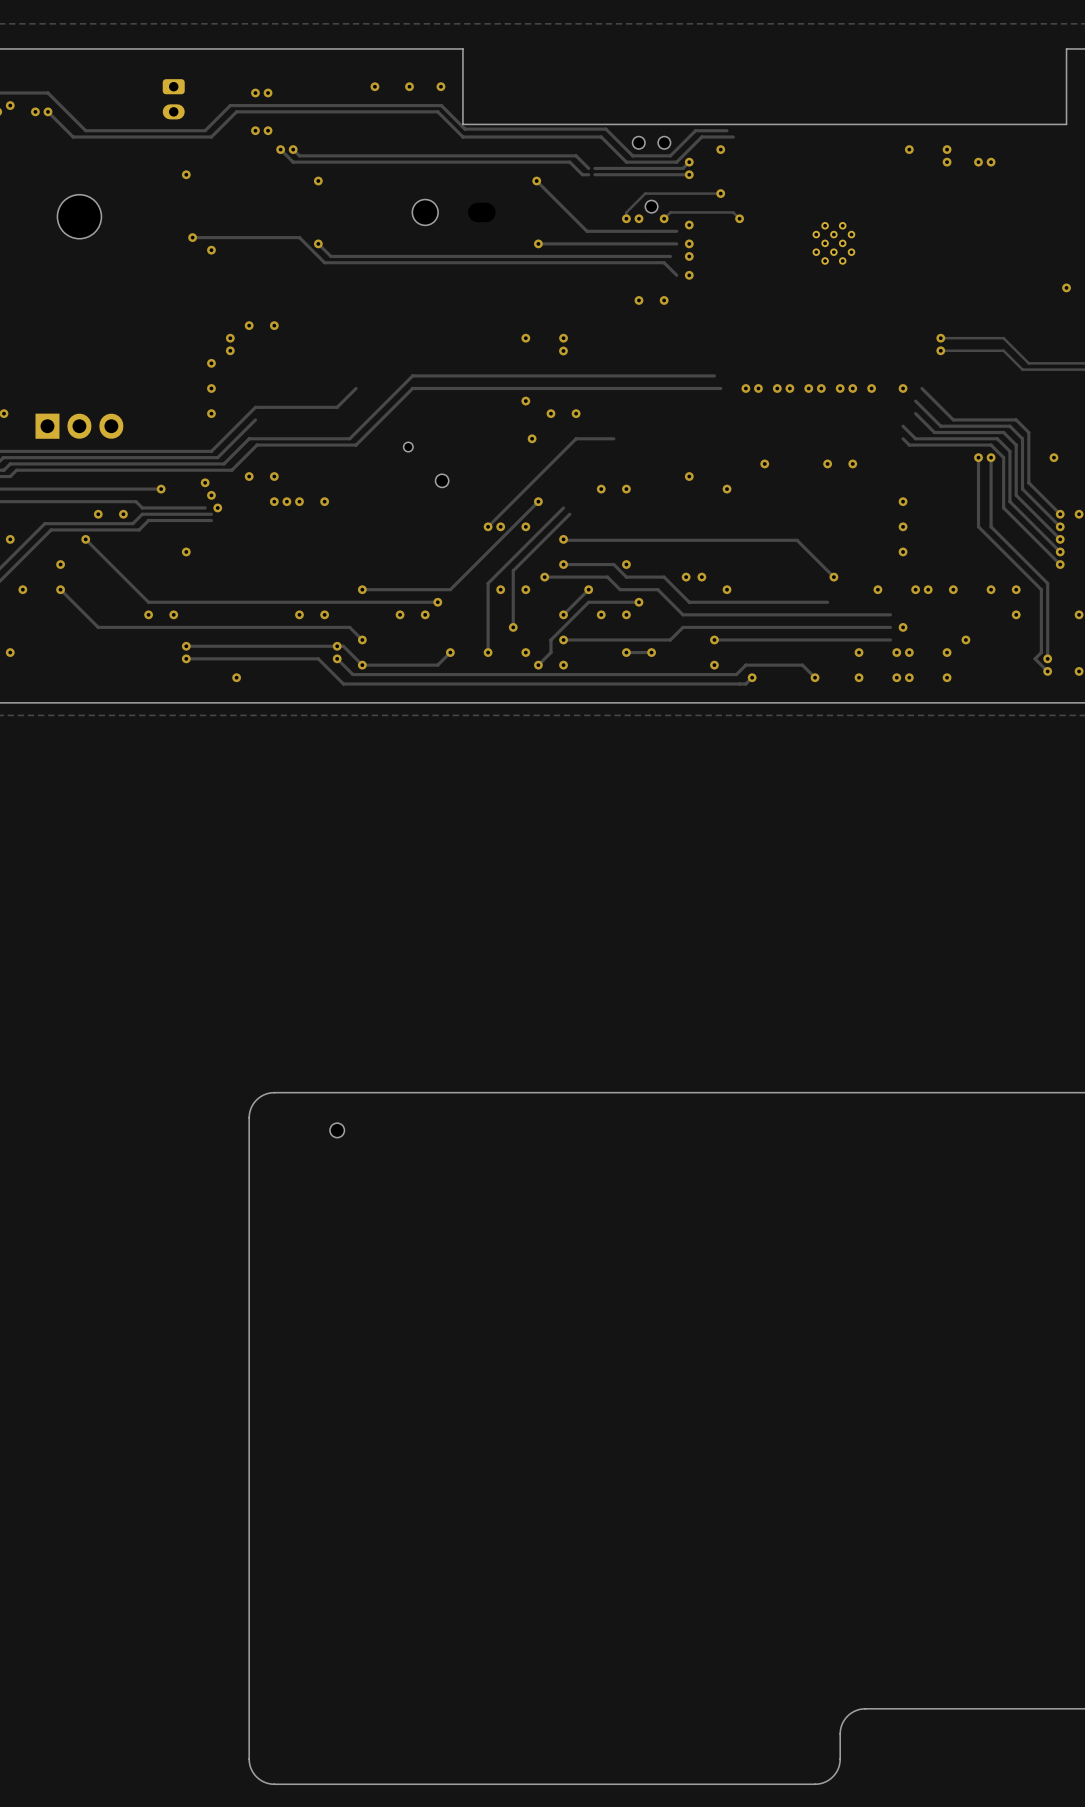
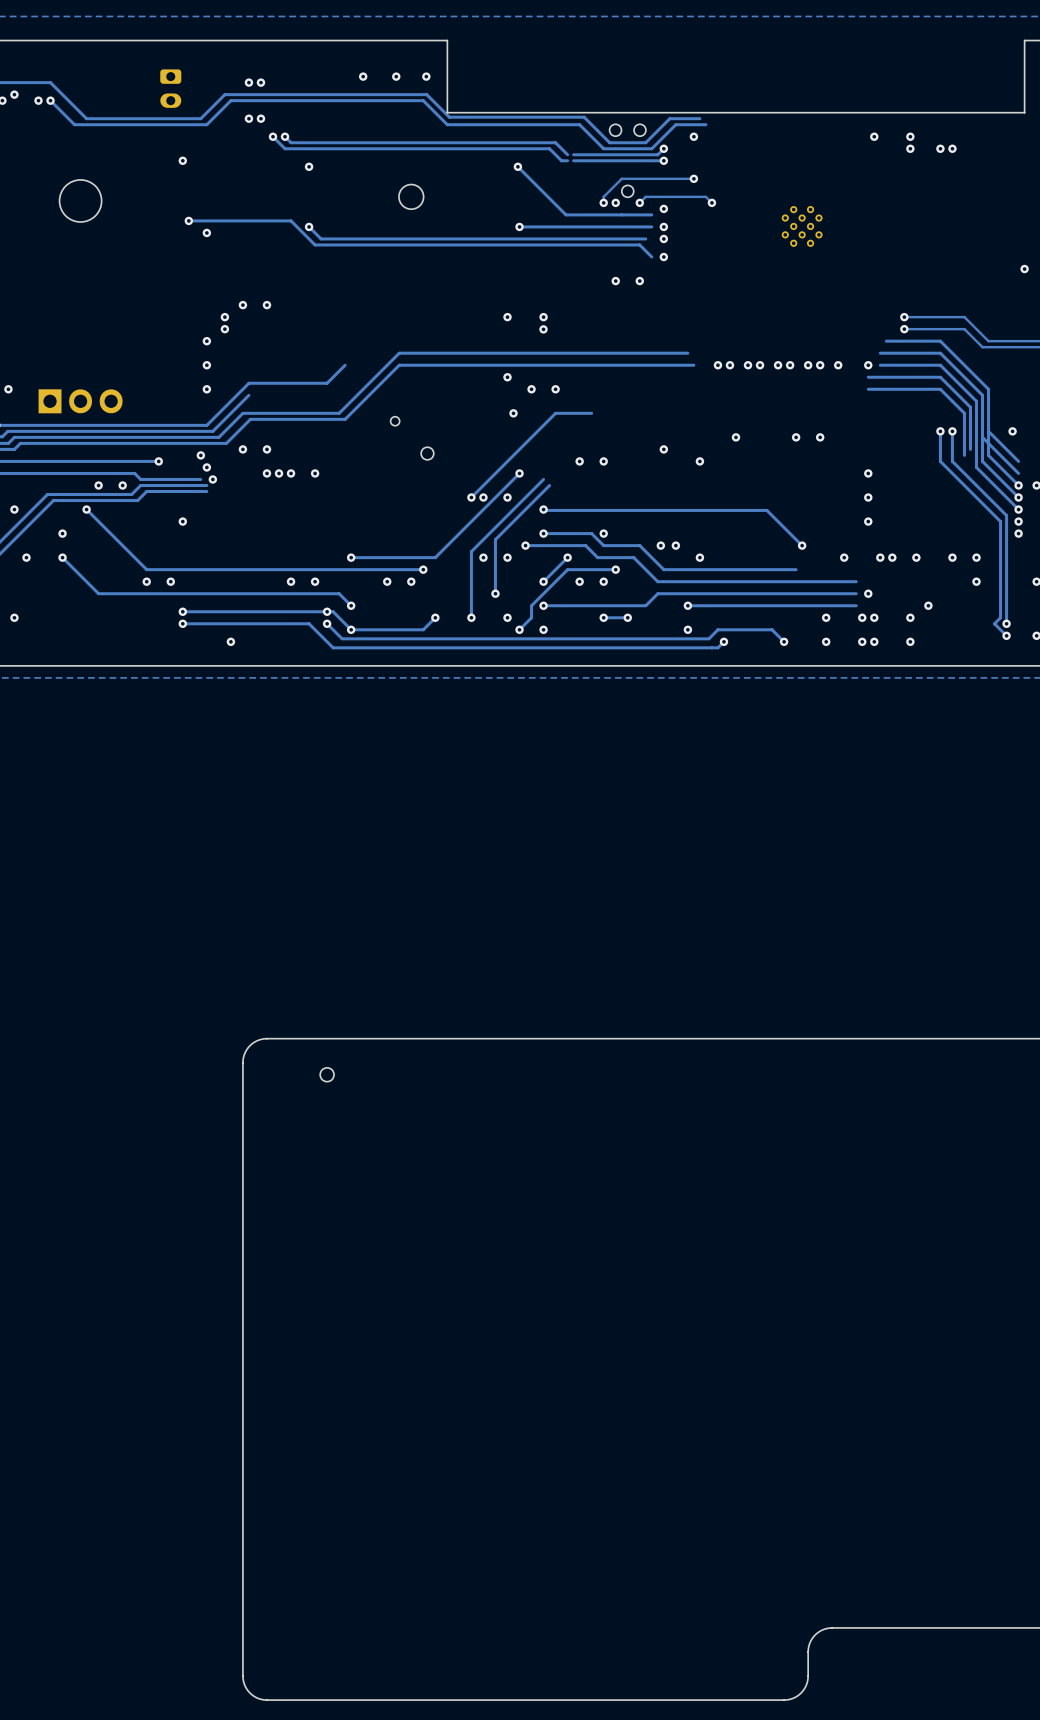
track: (921, 388) (953, 419) (1016, 419) (1028, 432) -> (886, 341) (940, 341) (988, 389) (988, 407)
track: (915, 401) (940, 426) (1009, 426) (1022, 438) -> (880, 353) (940, 353) (982, 395) (982, 413)
track: (915, 413) (934, 432) (1003, 432) (1016, 445) -> (880, 365) (940, 365) (976, 401) (976, 419)
track: (903, 426) (915, 438) (997, 438) (1009, 451) -> (868, 377) (940, 377) (970, 407) (970, 425)
track: (903, 438) (909, 445) (991, 445) (1003, 457) -> (868, 389) (940, 389) (964, 413) (964, 431)
track: none -> (988, 431) (1018, 461)
track: none -> (982, 437) (1018, 473)
track: (1009, 476) (1009, 501) (1060, 551) -> none
track: (1003, 482) (1003, 507) (1060, 564) -> none
track: (978, 489) (978, 526) (1041, 589) -> (940, 461) (1000, 521) (1000, 557)
track: (991, 489) (991, 526) (1047, 583) -> (952, 461) (1006, 515) (1006, 551)

